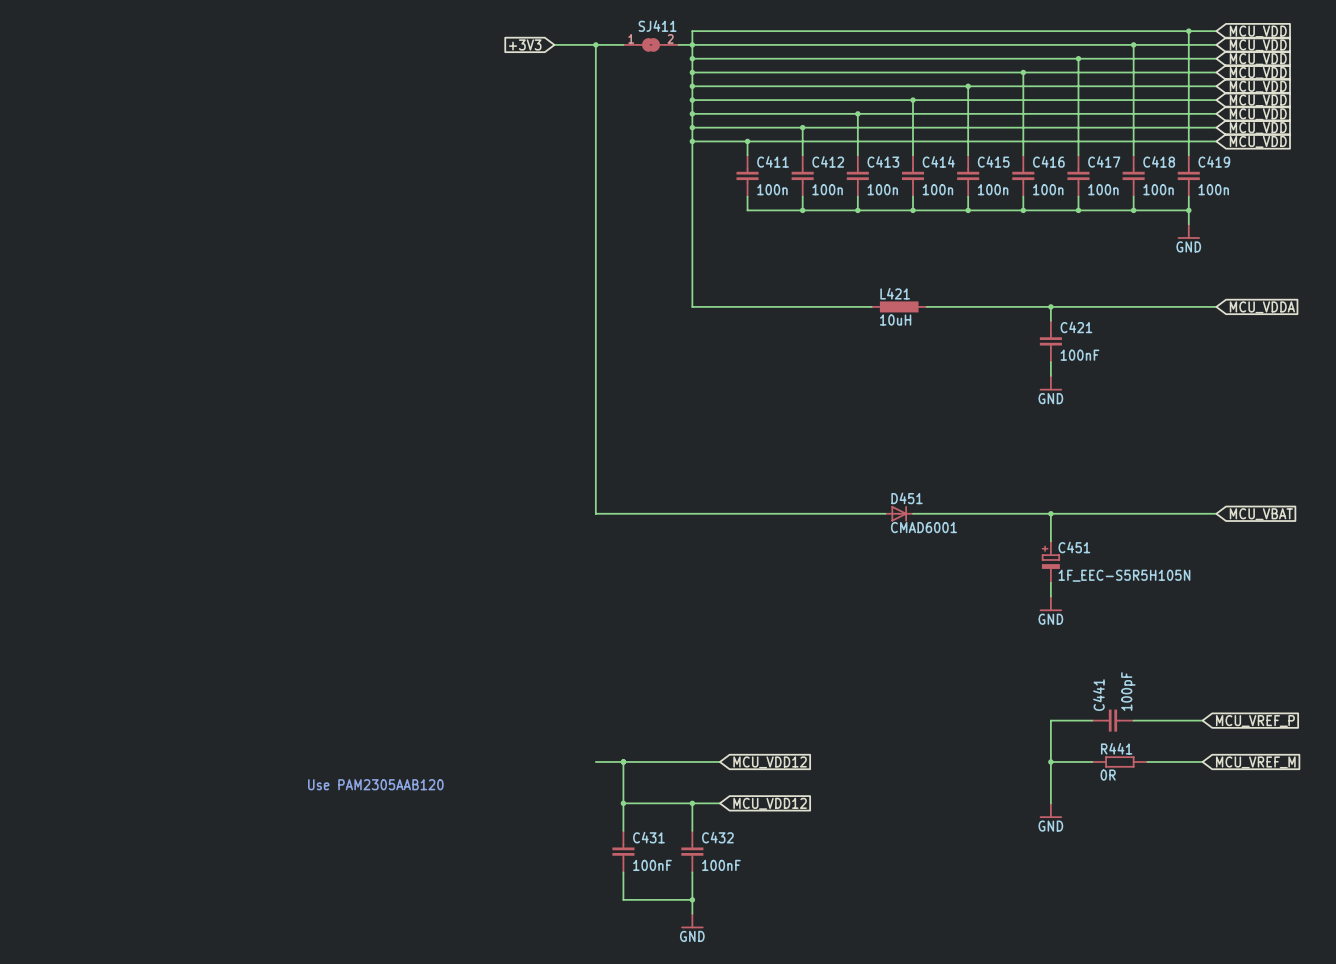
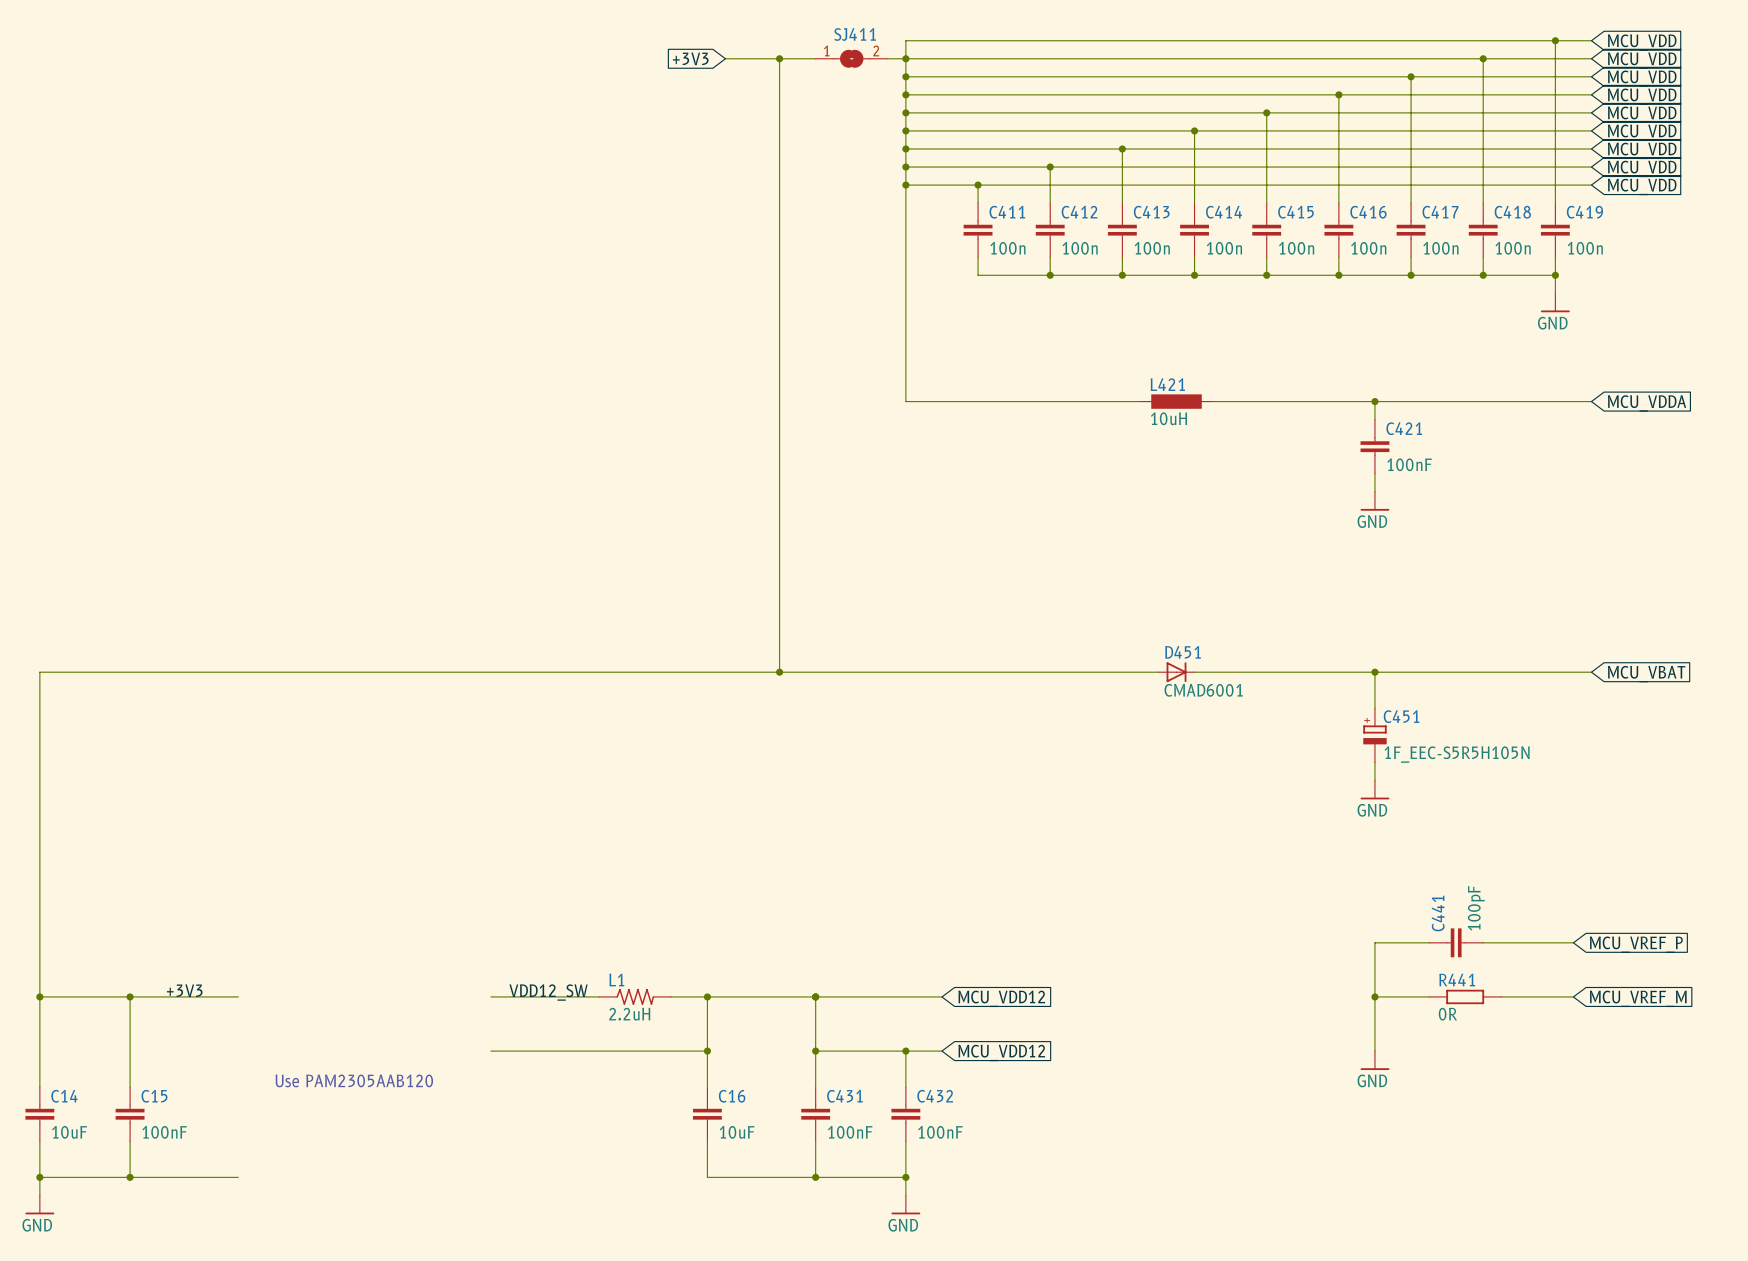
wire: none -> (779, 672) (39, 672) (39, 1087)
junction: none -> (779, 672)
label: none -> +3V3 (184, 990)
label: none -> VDD12_SW (548, 992)
wire: none -> (39, 996) (238, 996)
junction: none -> (39, 996)
wire: none -> (130, 996) (130, 1087)
junction: none -> (130, 996)
wire: none -> (490, 996) (599, 996)
L1: none -> 2.2uH (635, 996)
wire: none -> (671, 996) (779, 996)
wire: none -> (707, 996) (707, 1087)
junction: none -> (707, 996)
text position: Use PAM2305AAB120 (375, 784) -> Use PAM2305AAB120 (354, 1080)
wire: none -> (490, 1051) (707, 1051)
junction: none -> (707, 1051)
C14: none -> 10uF (39, 1114)
C15: none -> 100nF (130, 1114)
C16: none -> 10uF (707, 1114)
wire: none -> (39, 1141) (39, 1195)
wire: none -> (130, 1141) (130, 1177)
wire: none -> (707, 1141) (707, 1177) (815, 1177)
wire: none -> (39, 1177) (238, 1177)
junction: none -> (39, 1177)
junction: none -> (130, 1177)
junction: none -> (815, 1177)
power symbol: none -> GND (39, 1204)

